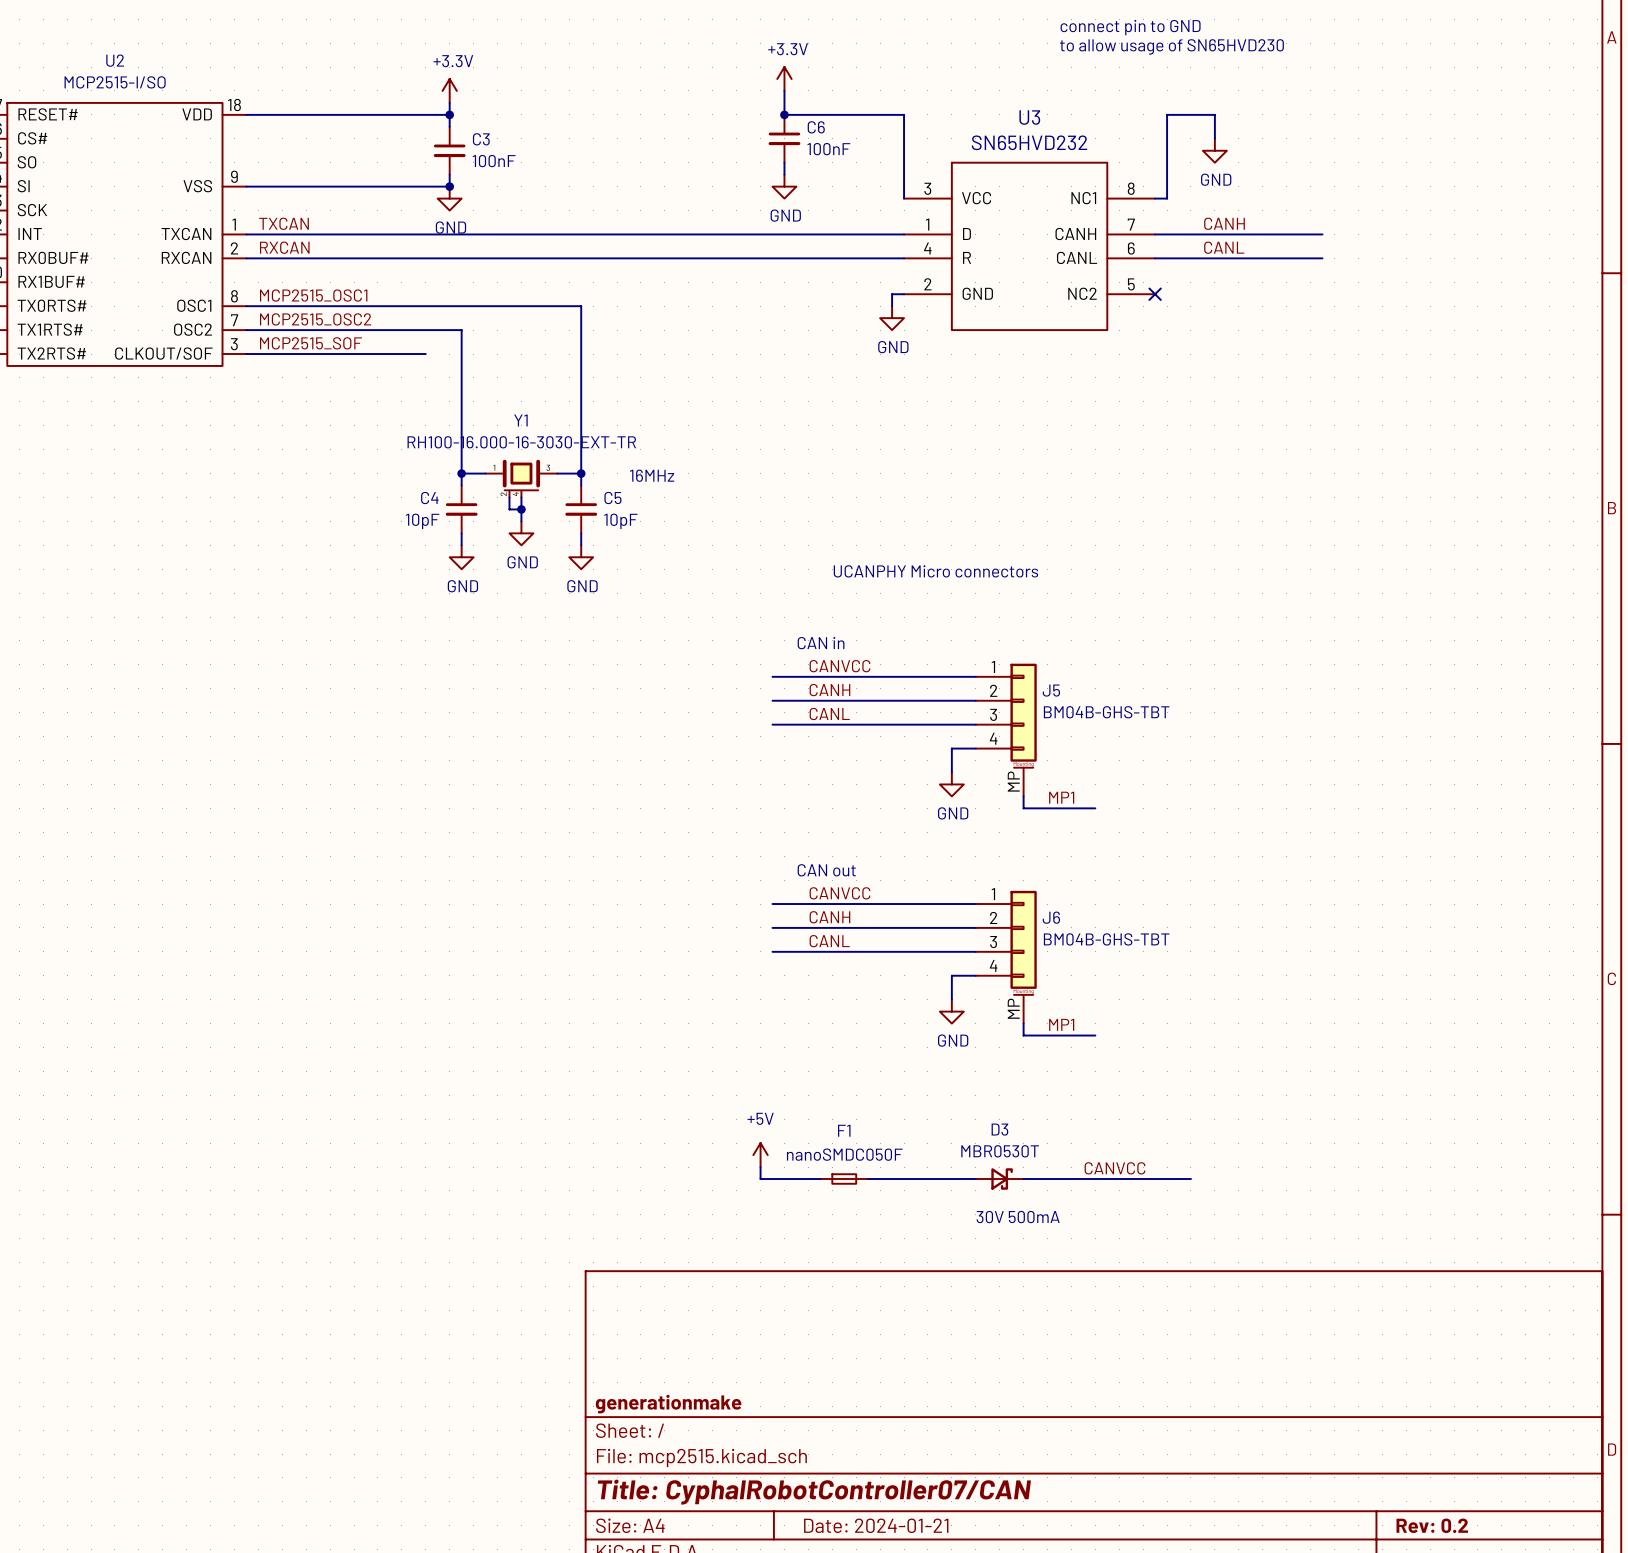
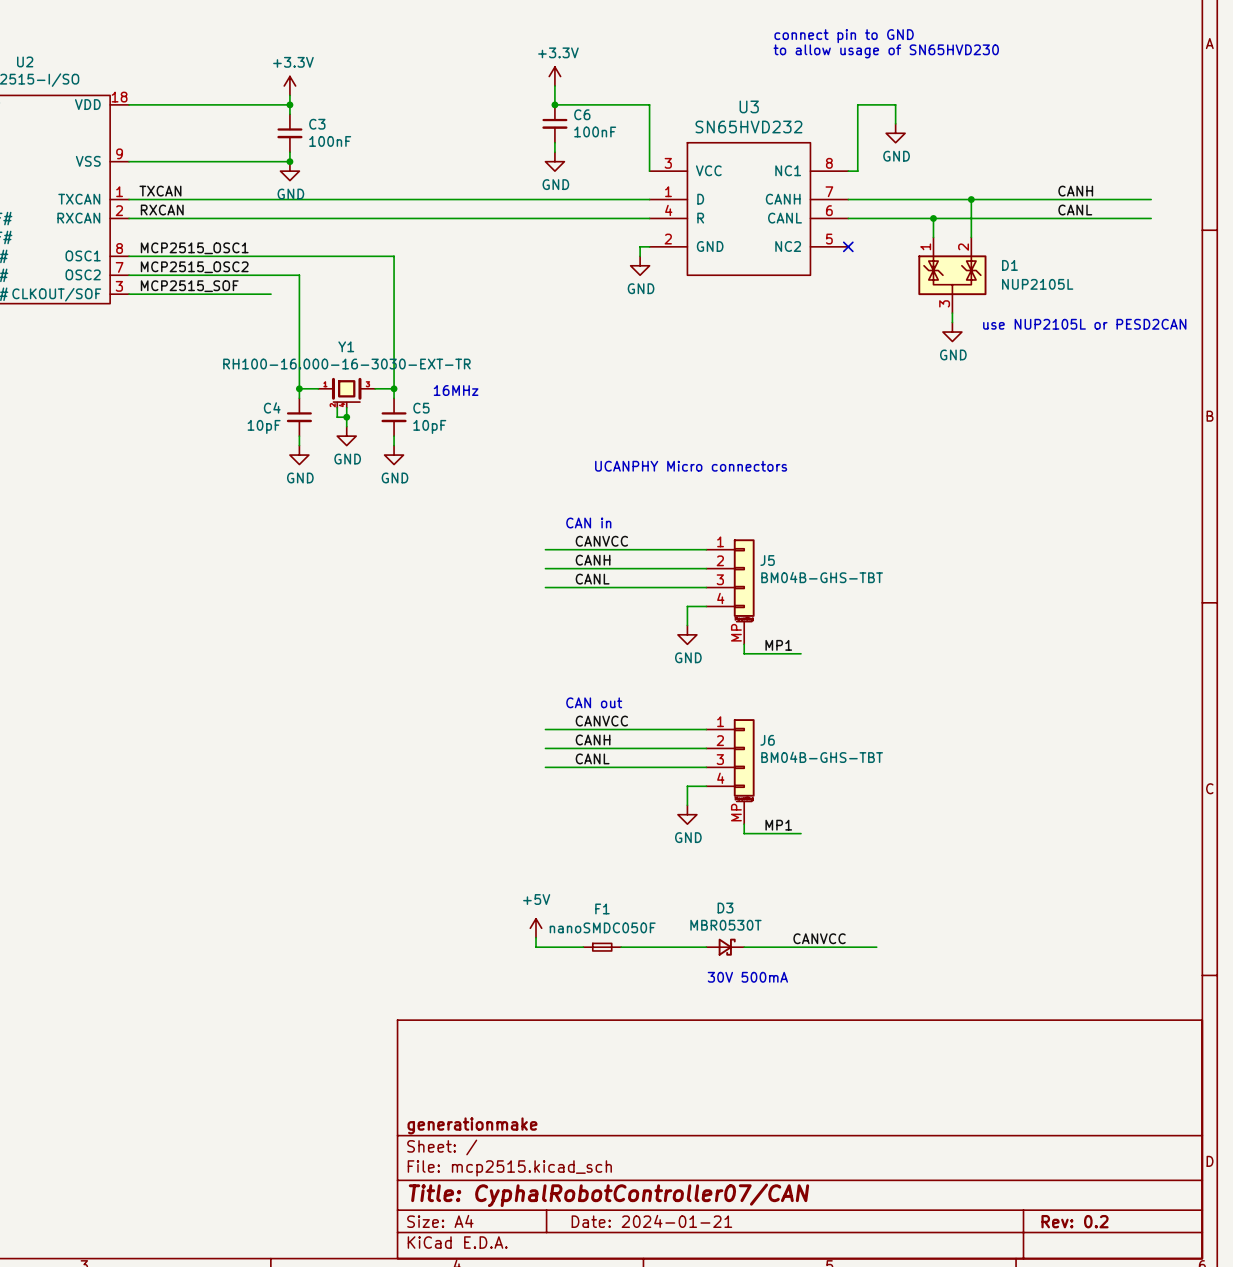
label position: CANH (1224, 223) -> CANH (1075, 191)
wire: none -> (971, 199) (971, 237)
junction: none -> (971, 199)
wire: none -> (980, 199) (1151, 199)
label position: CANL (1224, 247) -> CANL (1075, 210)
wire: none -> (933, 218) (933, 237)
junction: none -> (933, 218)
wire: none -> (980, 218) (1151, 218)
D1: none -> NUP2105L (952, 275)
wire: none -> (952, 313) (952, 322)
text: none -> use NUP2105L or PESD2CAN (1084, 324)
power symbol: none -> GND (952, 332)

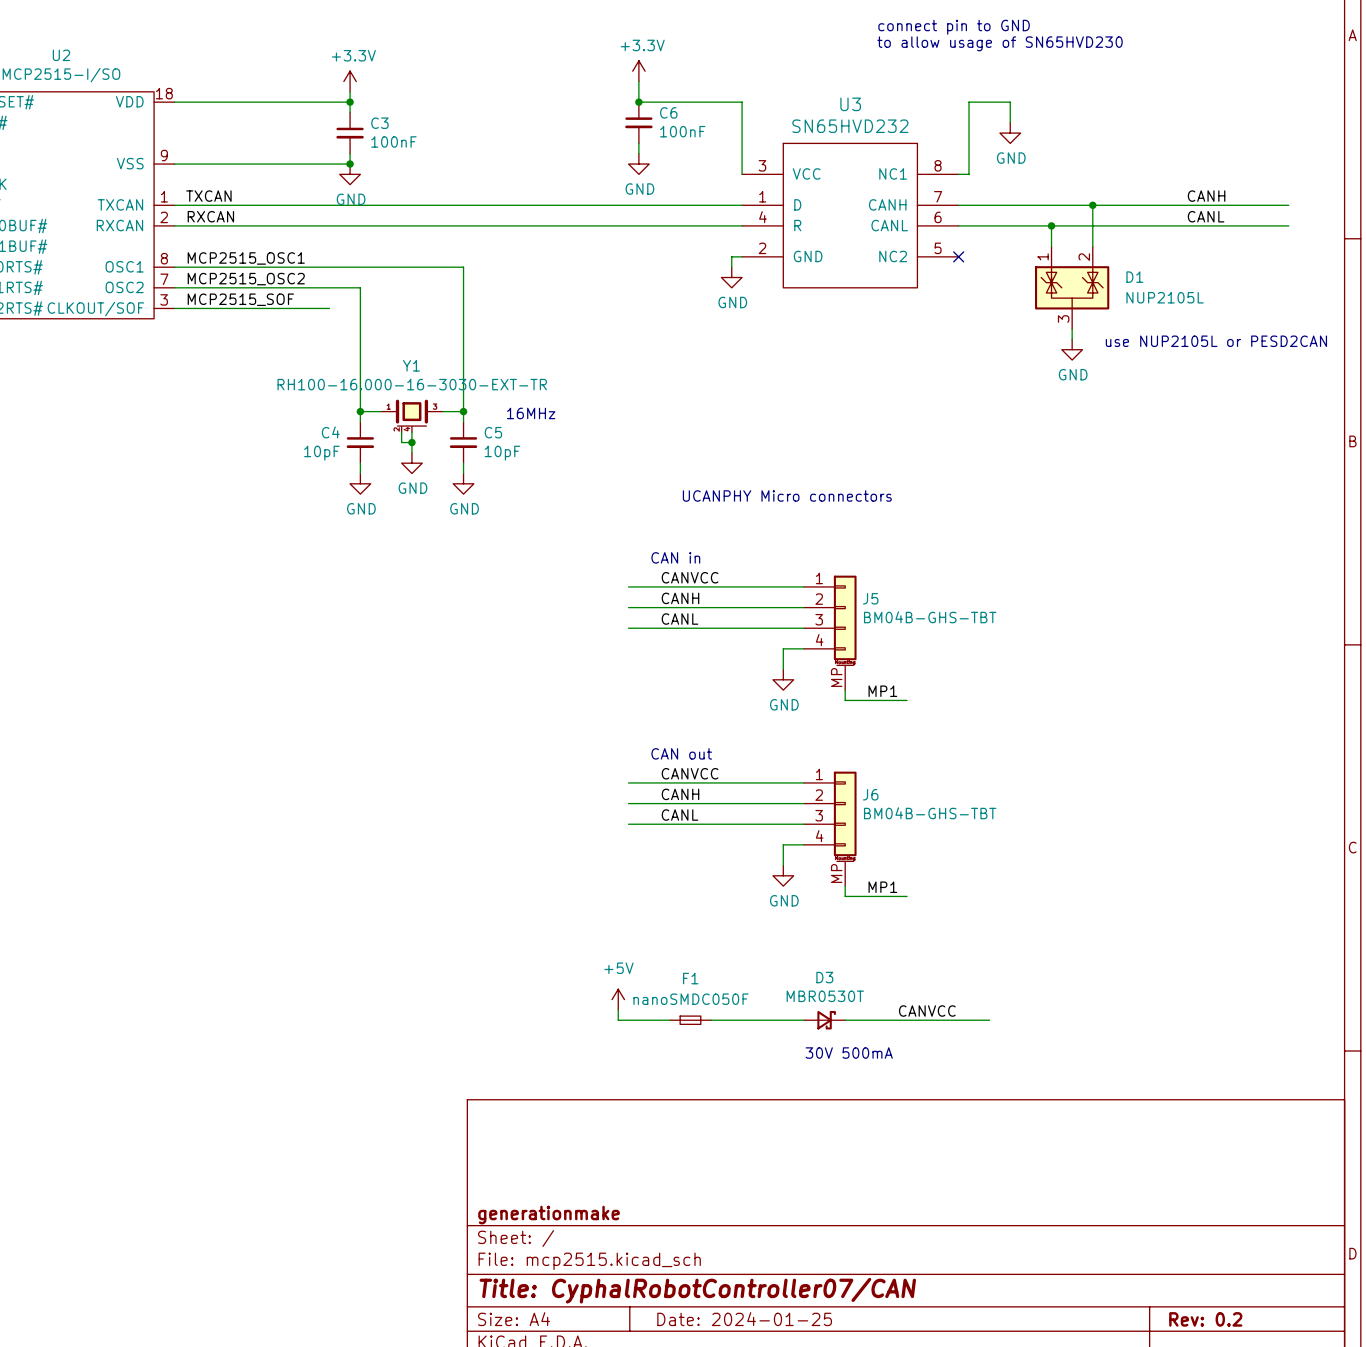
title block: Date: 2024-01-21 (651, 1221) -> Date: 2024-01-25 (744, 1319)

